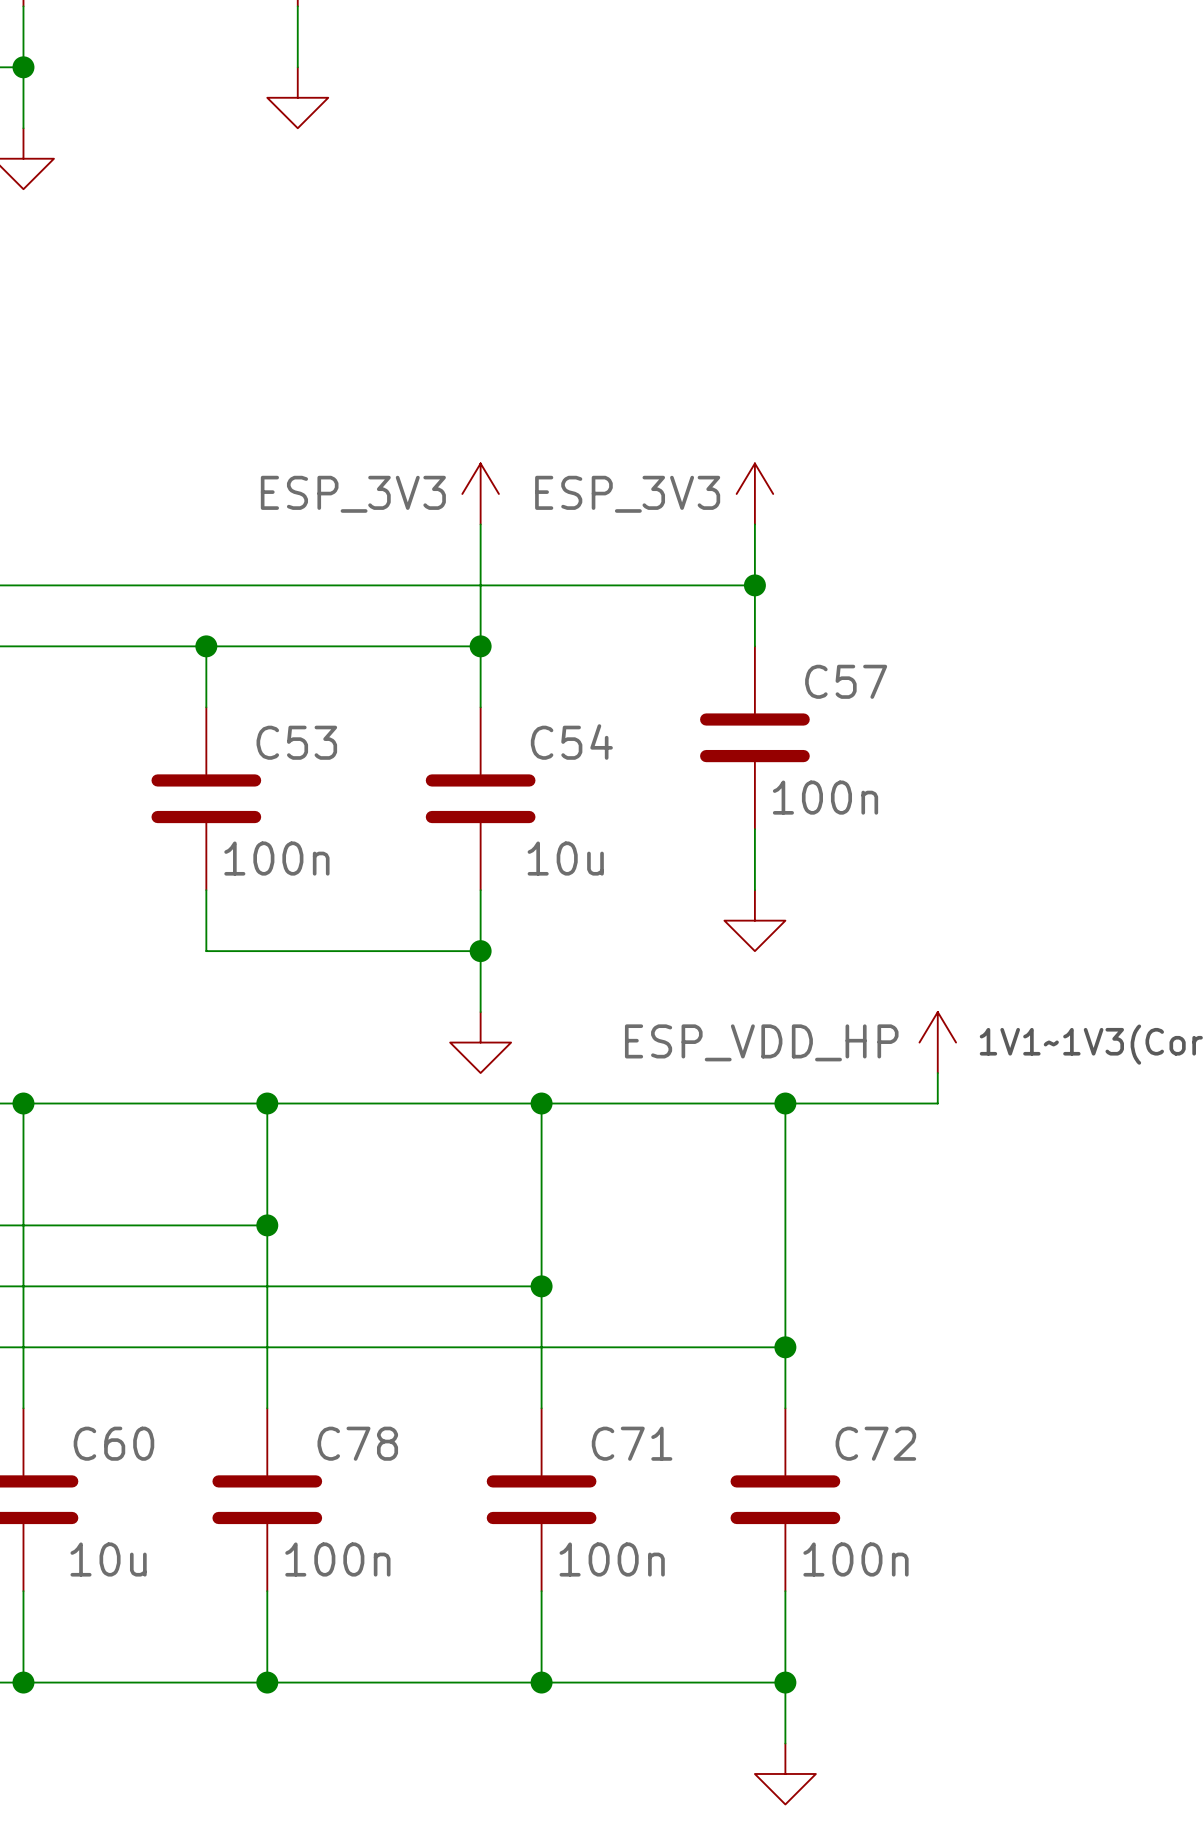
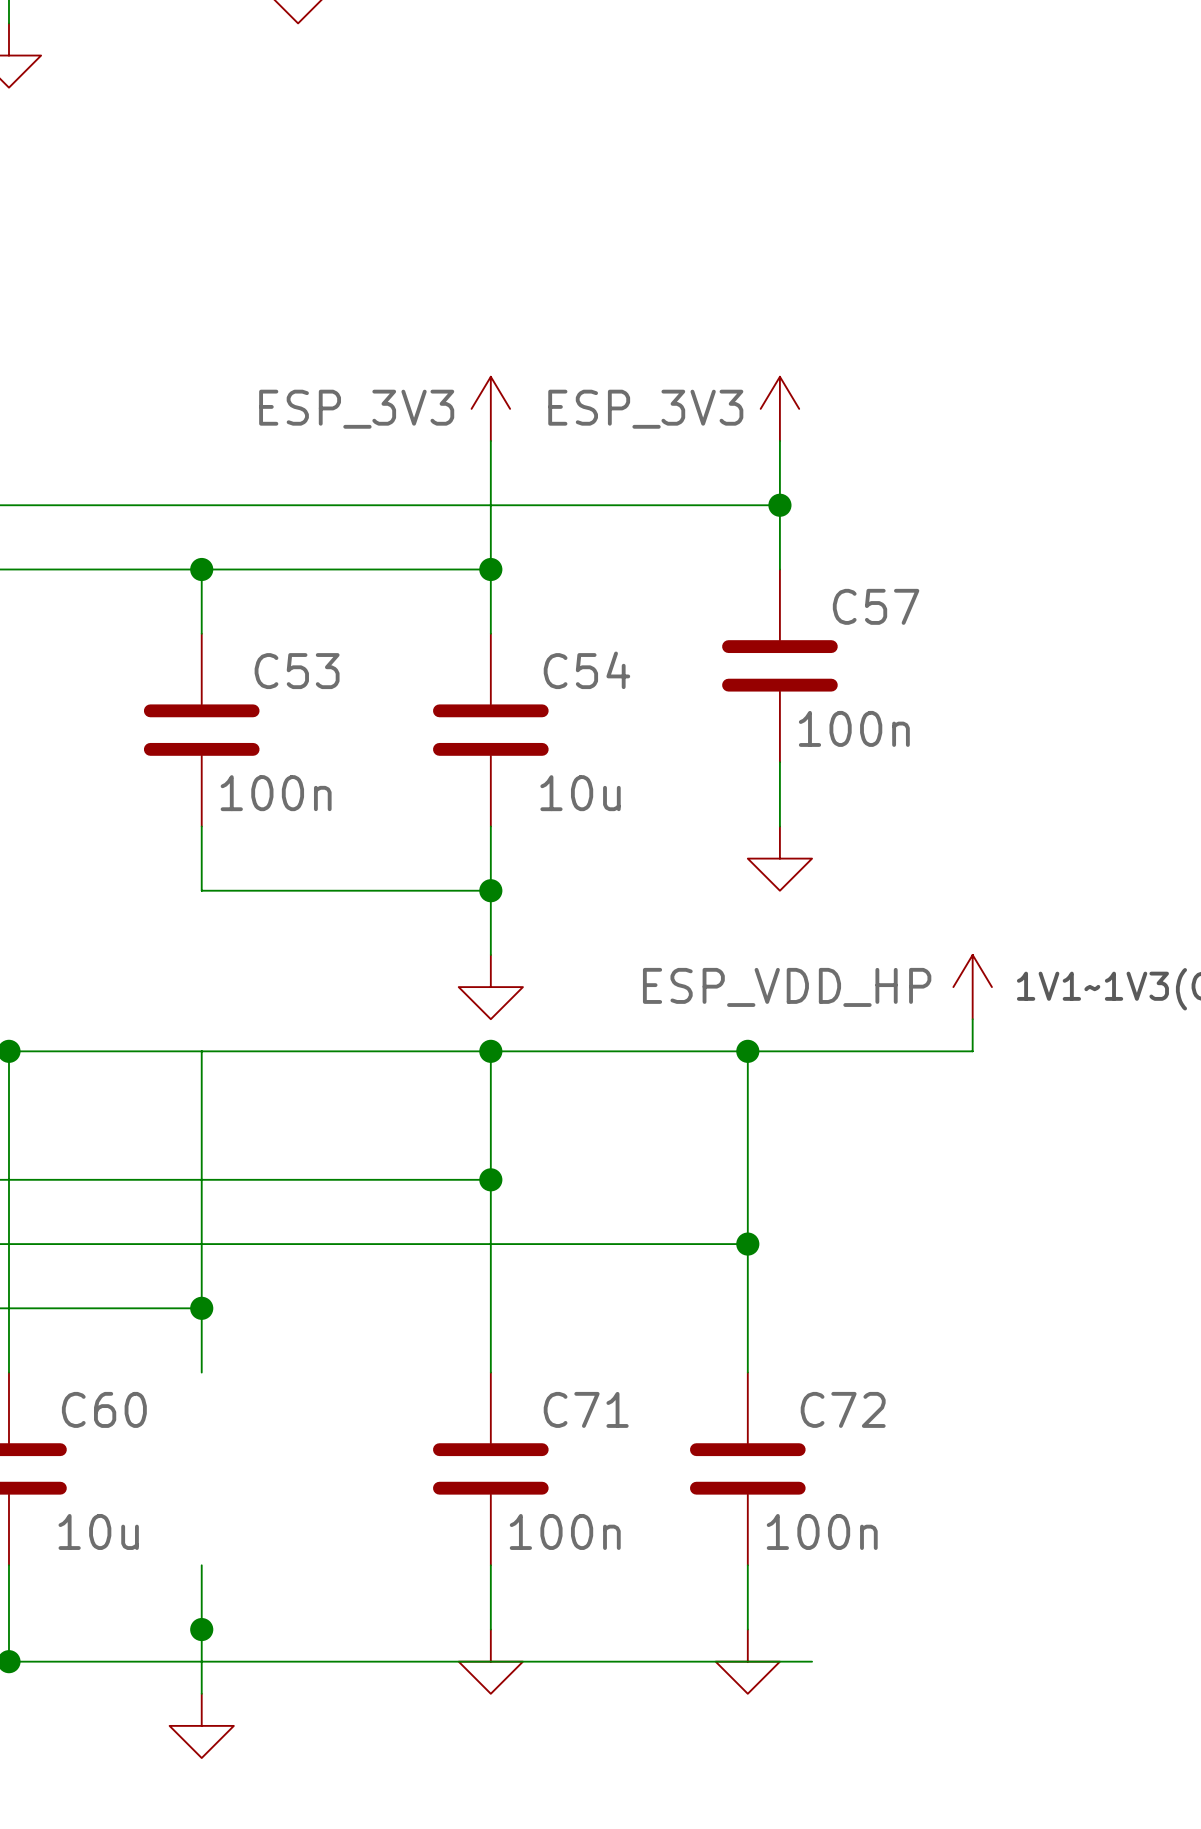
wire: (267, 1103) (267, 1408) -> (201, 1051) (201, 1372)
junction: (267, 1103) -> none
wire: (541, 1103) (541, 1408) -> (490, 1051) (490, 1372)
junction position: (541, 1103) -> (490, 1051)
wire: (785, 1103) (785, 1408) -> (747, 1051) (747, 1372)
junction position: (785, 1103) -> (747, 1051)
wire: none -> (265, 1179) (490, 1179)
junction: (267, 1225) -> none
junction: none -> (490, 1179)
wire: none -> (555, 1244) (747, 1244)
junction: (541, 1286) -> none
wire: (206, 1347) (785, 1347) -> none
junction: none -> (201, 1308)
junction position: (785, 1347) -> (747, 1244)
C78: 100n (267, 1499) -> none
C71 position: (541, 1499) -> (490, 1468)
C72 position: (785, 1499) -> (747, 1468)
wire: none -> (201, 1565) (201, 1693)
wire: (267, 1591) (267, 1682) -> none
wire: none -> (490, 1565) (490, 1629)
wire: (541, 1591) (541, 1682) -> none
wire: none -> (747, 1565) (747, 1629)
wire: (785, 1591) (785, 1743) -> none
junction position: (267, 1682) -> (201, 1629)
power symbol: none -> (490, 1661)
junction: (541, 1682) -> none
junction: (785, 1682) -> none
power symbol: none -> (201, 1725)
power symbol position: (785, 1773) -> (747, 1661)

